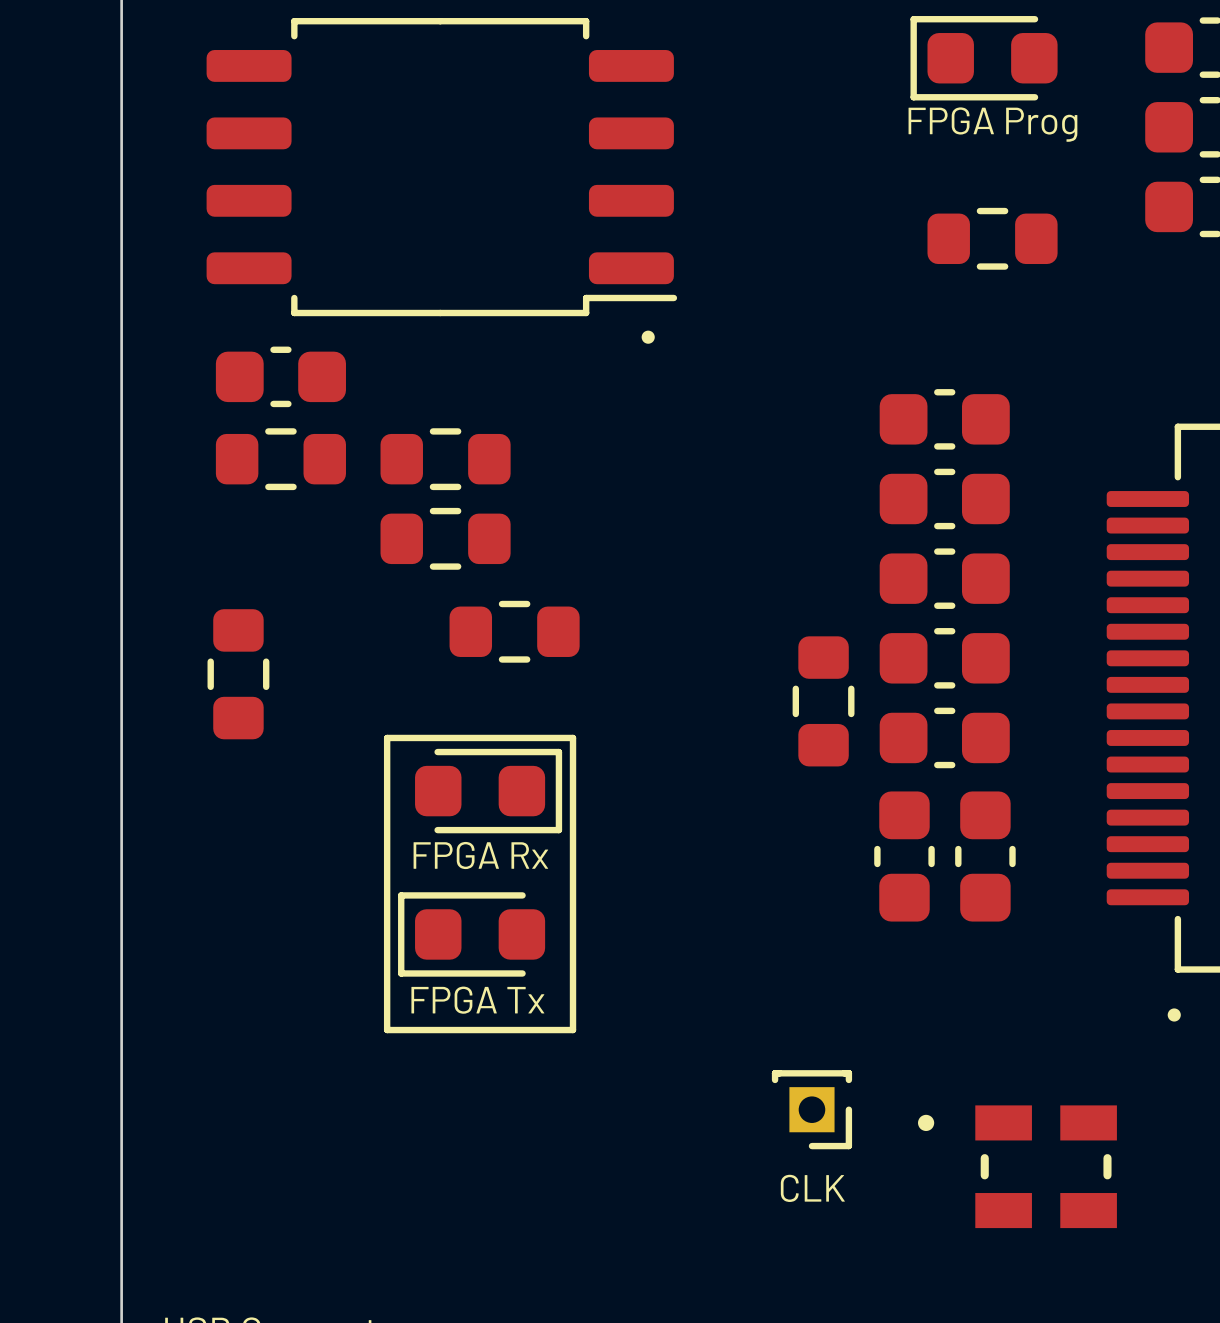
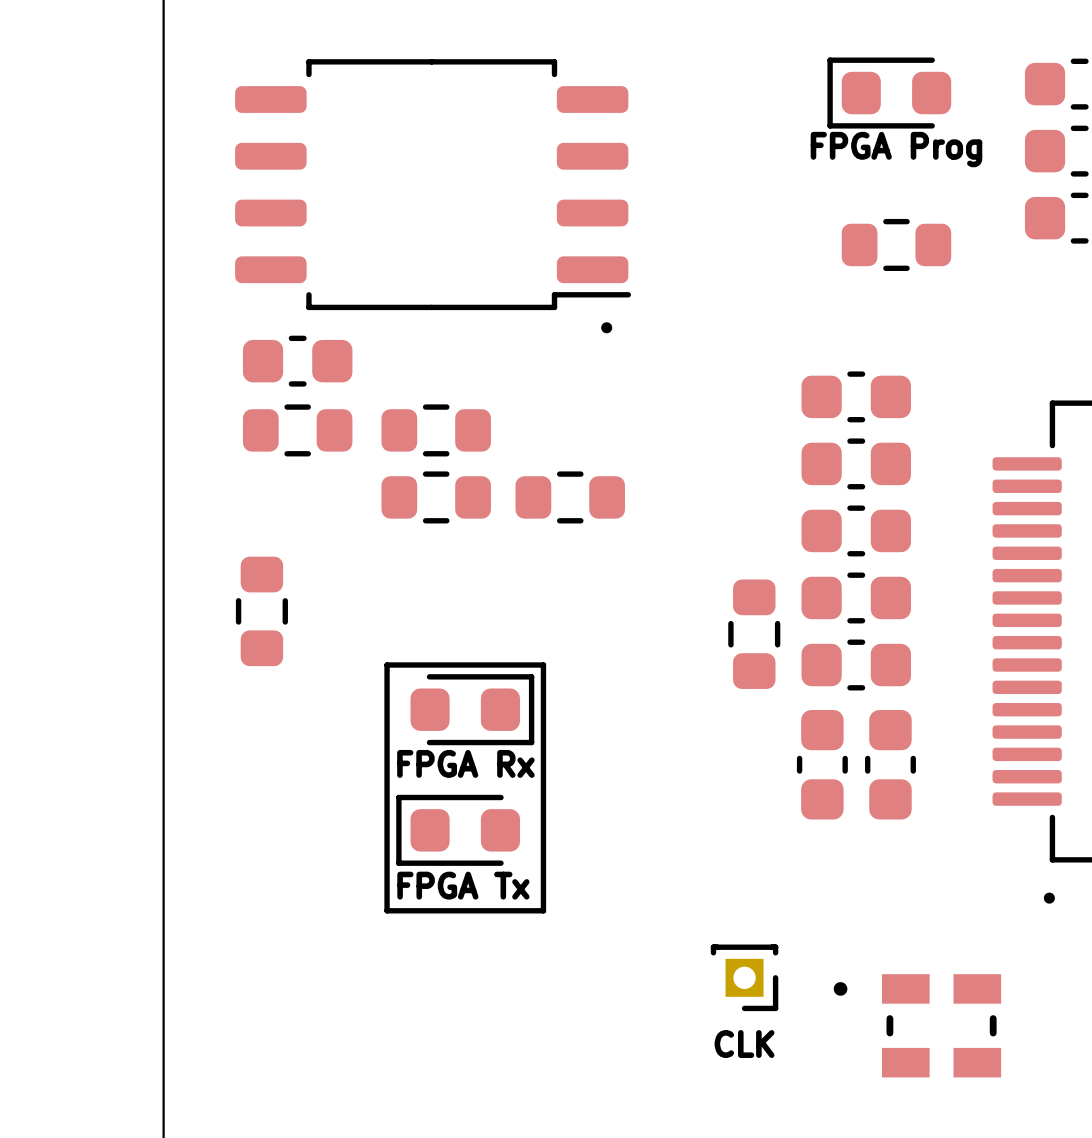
part position: (514, 631) -> (570, 497)

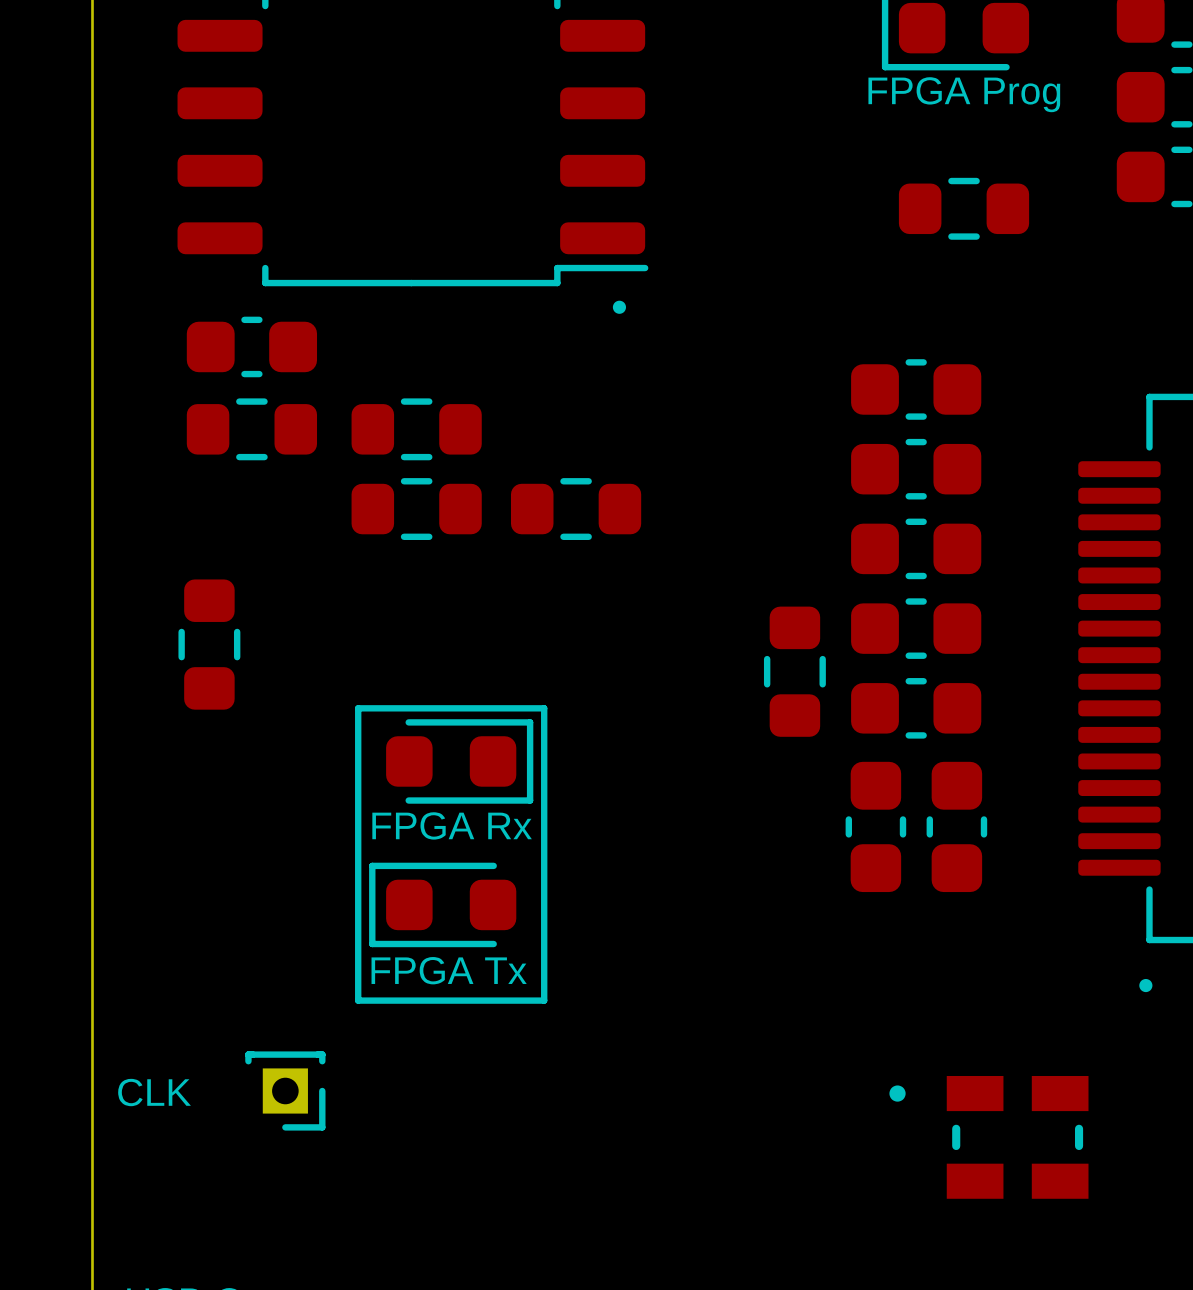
part position: (744, 977) -> (285, 1090)
text position: CLK (744, 1044) -> CLK (154, 1092)

